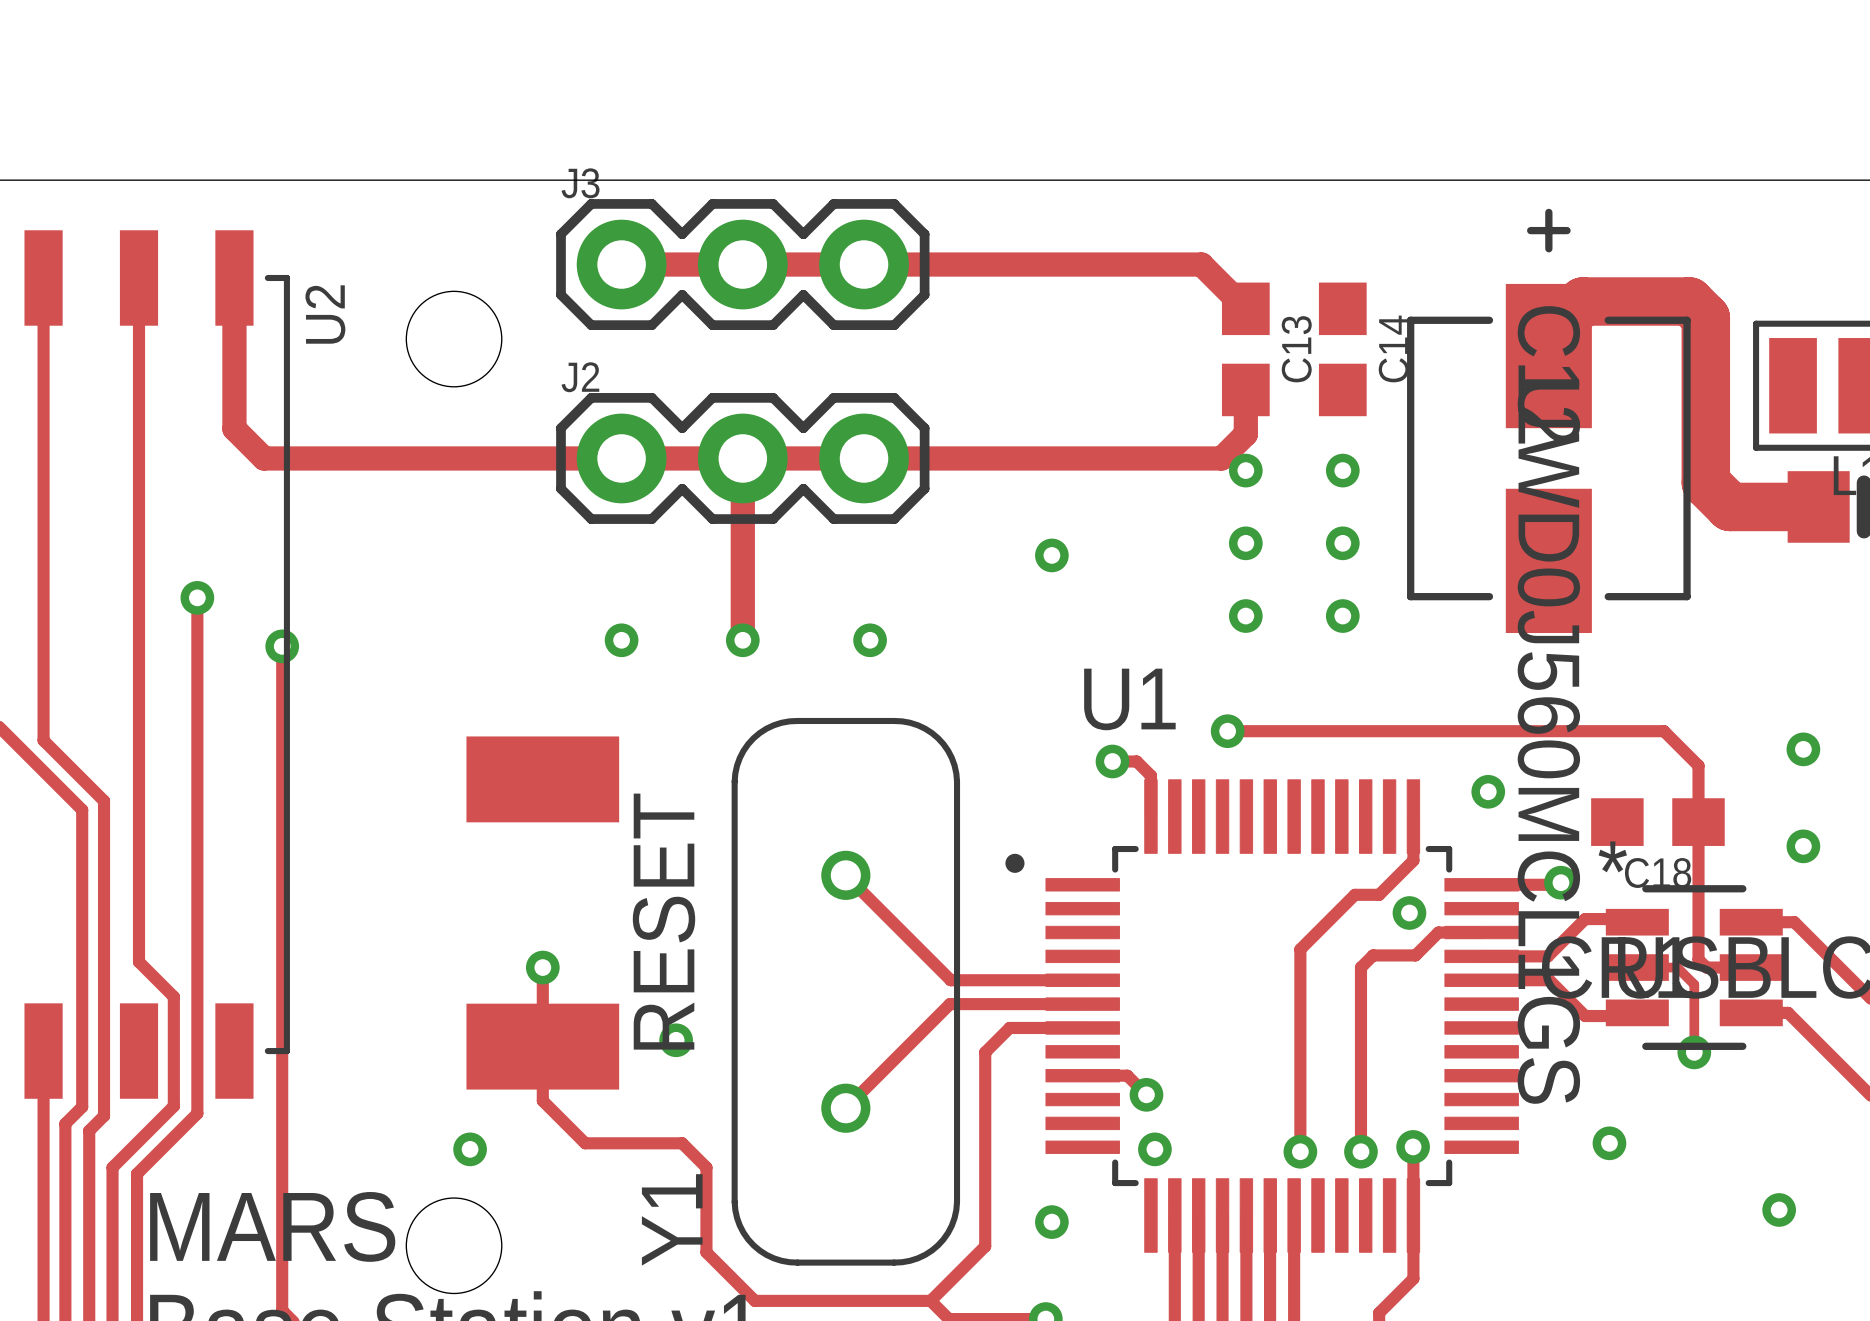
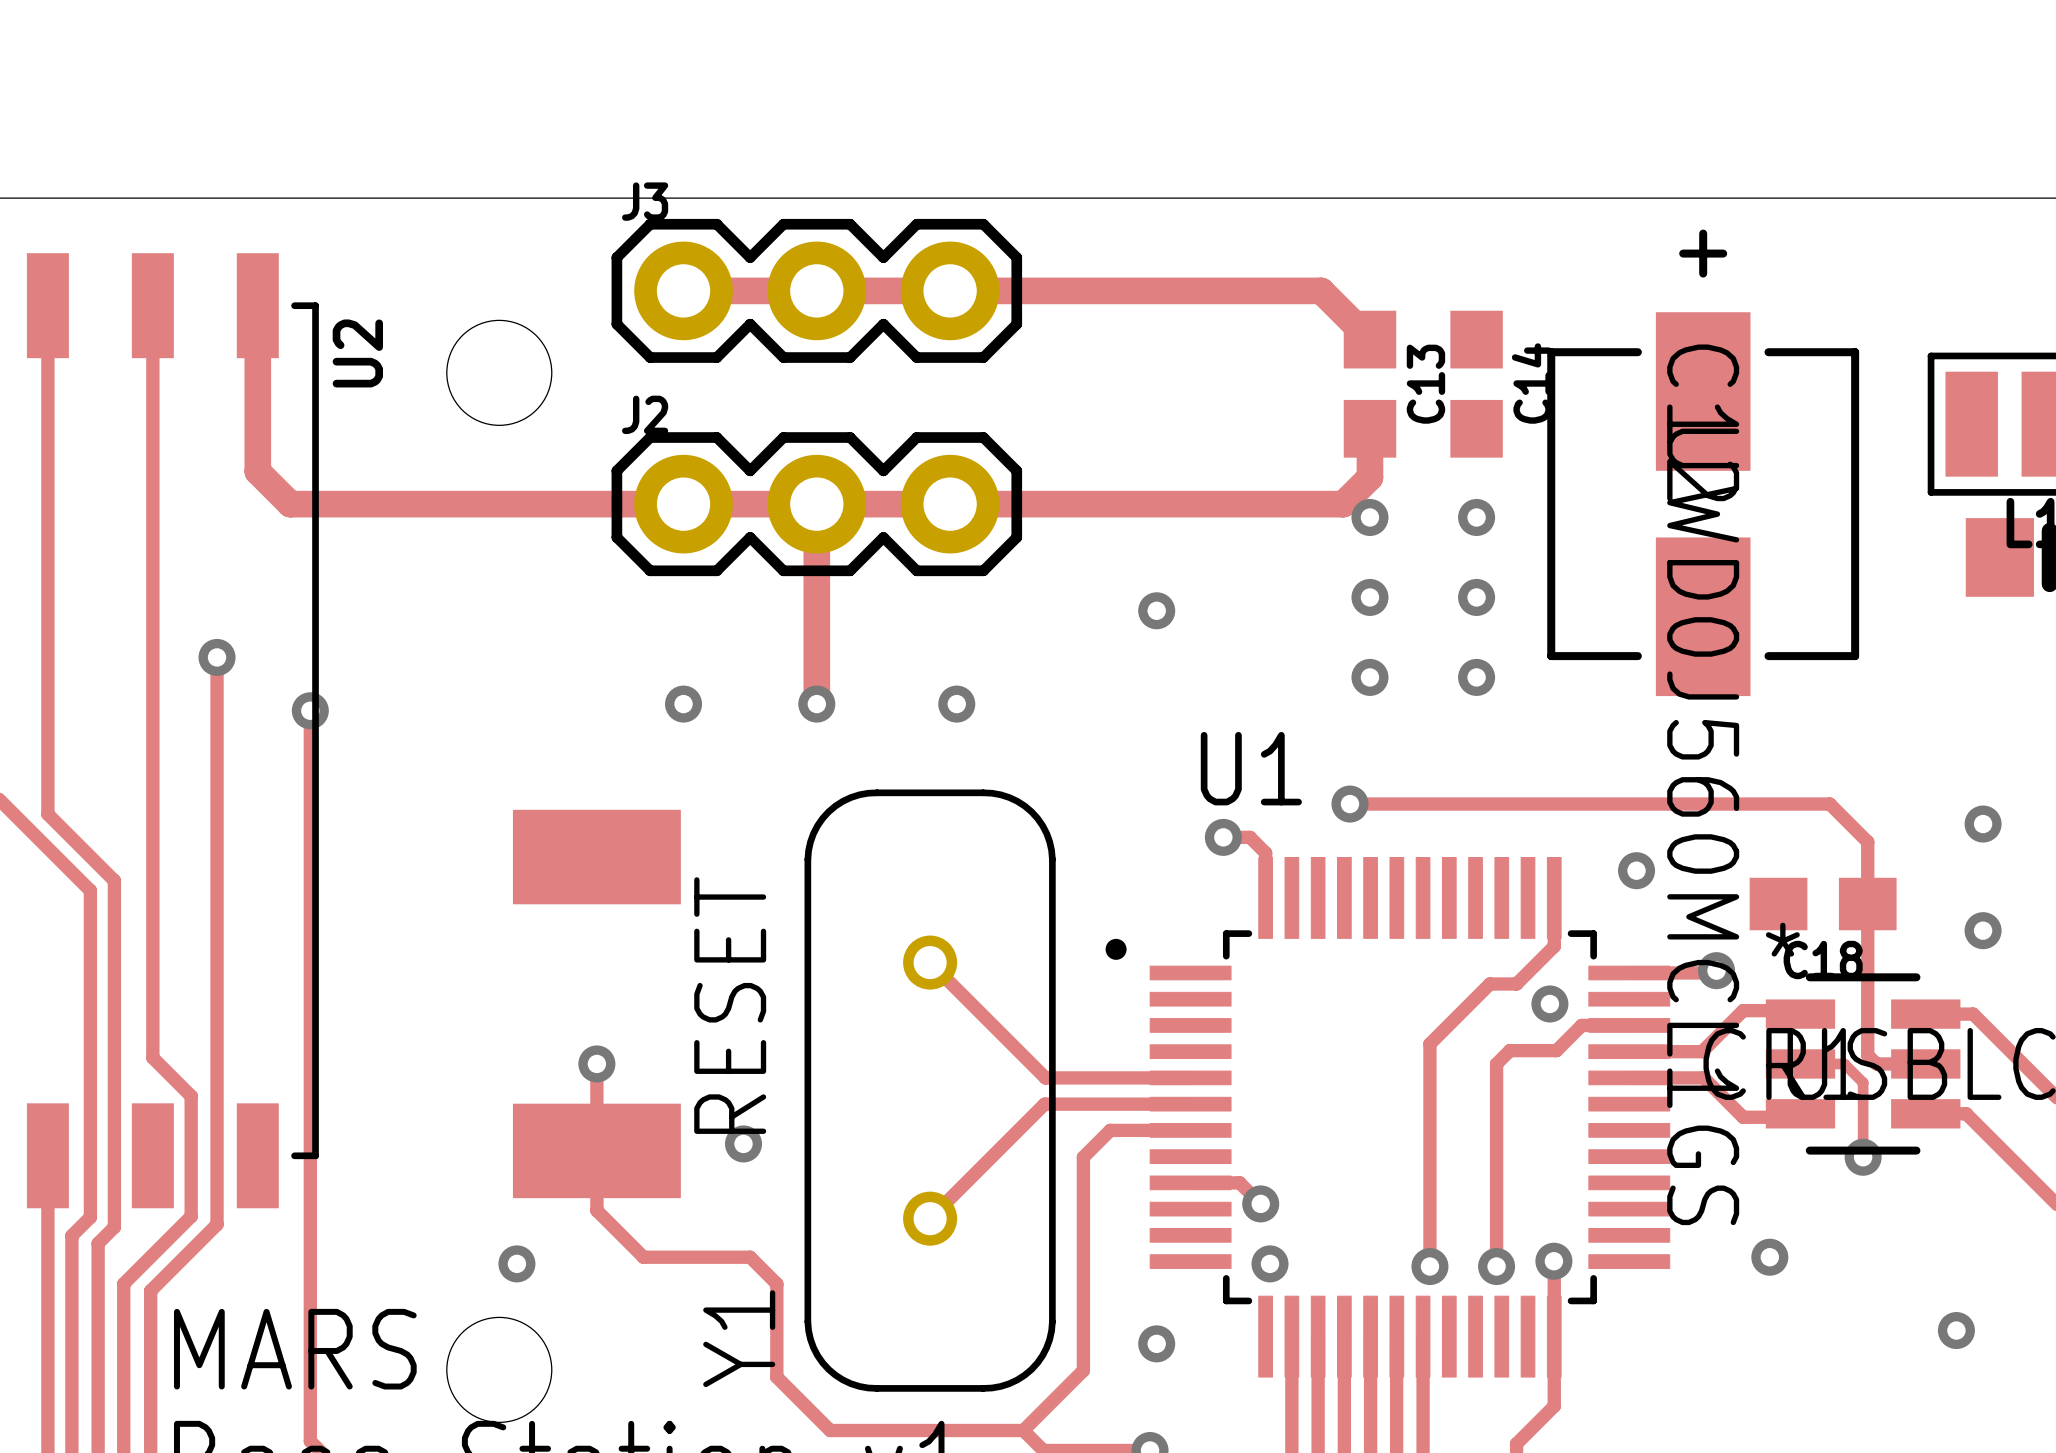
track: (1548, 356) (1566, 338) (1566, 317) (1582, 301) (1689, 301) (1705, 317) (1705, 482) (1730, 506) (1818, 506) -> none

